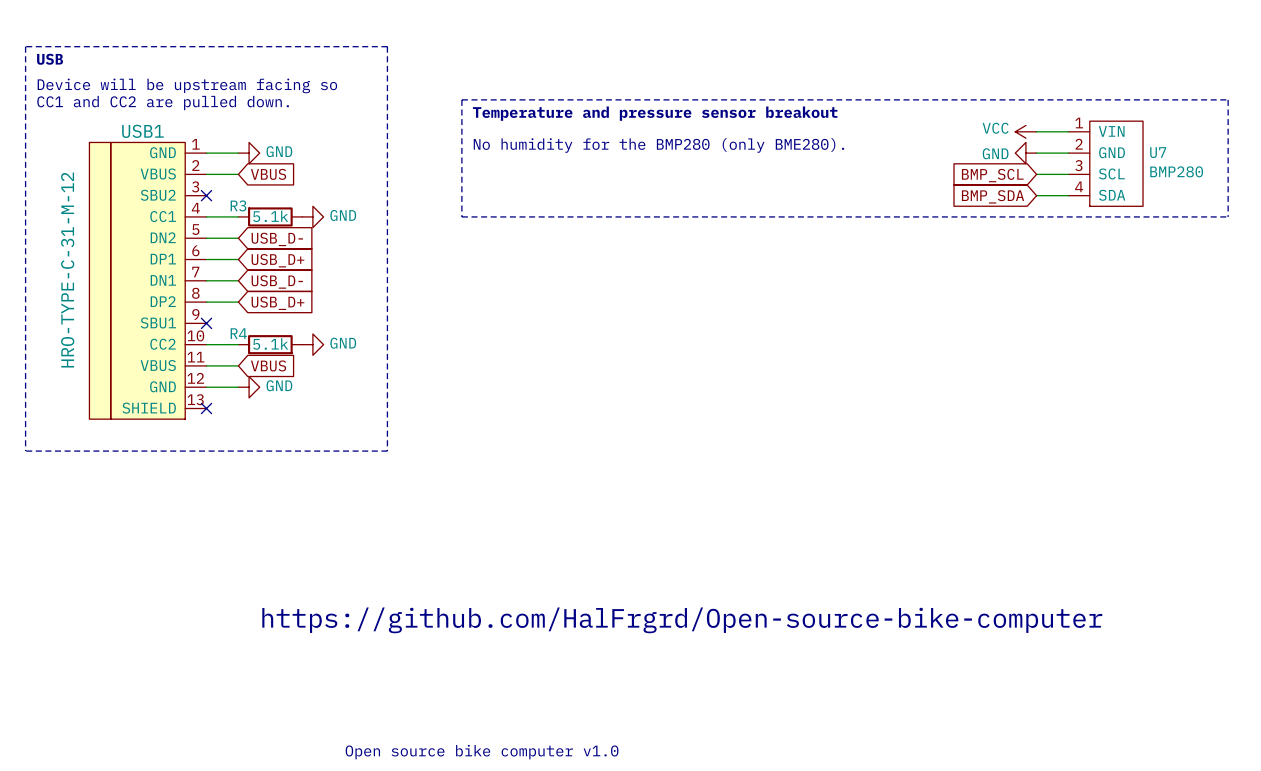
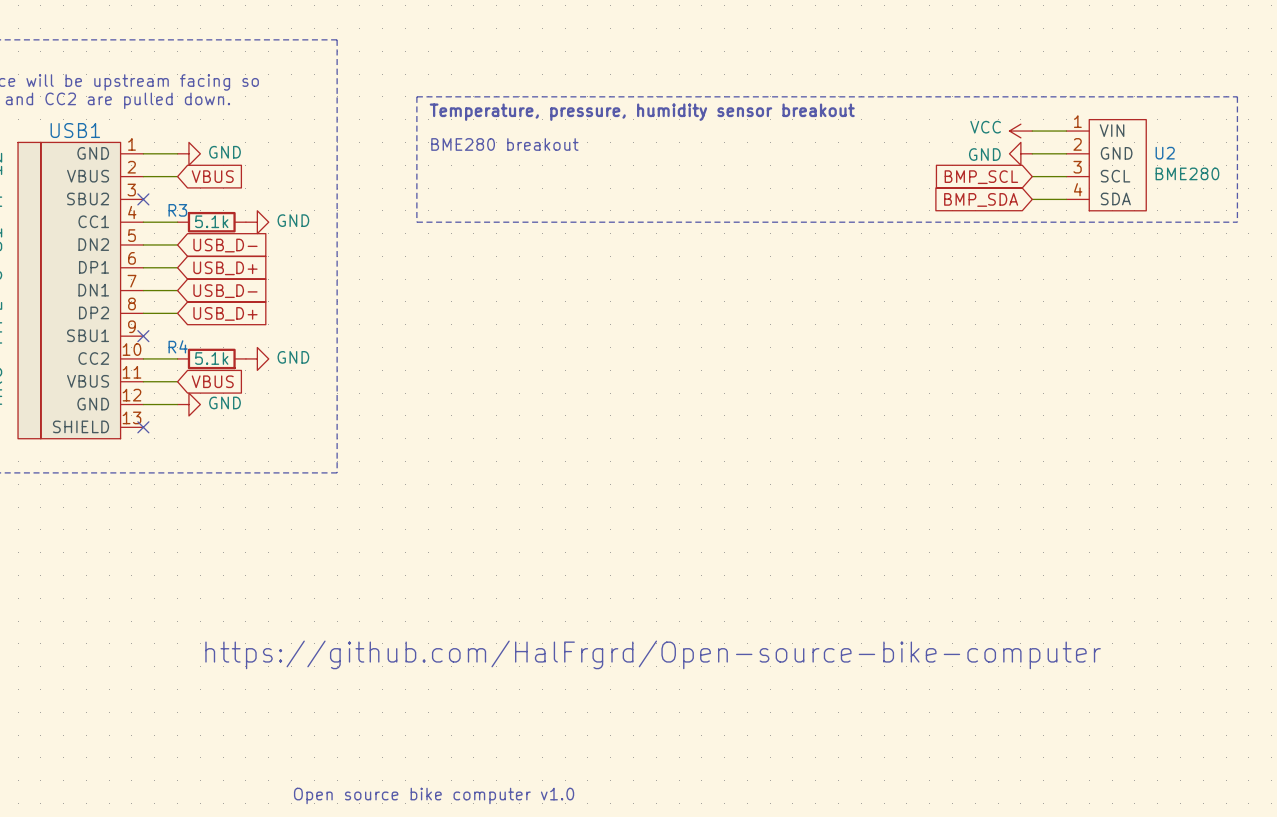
text: Temperature and pressure sensor breakout (655, 113) -> Temperature, pressure, humidity sensor breakout (642, 112)
text: No humidity for the BMP280 (only BME280). (658, 145) -> BME280 breakout (504, 144)
U7 name: U7 (1158, 152) -> U2 (1165, 153)
U7 value: BMP280 (1176, 171) -> BME280 (1187, 173)

